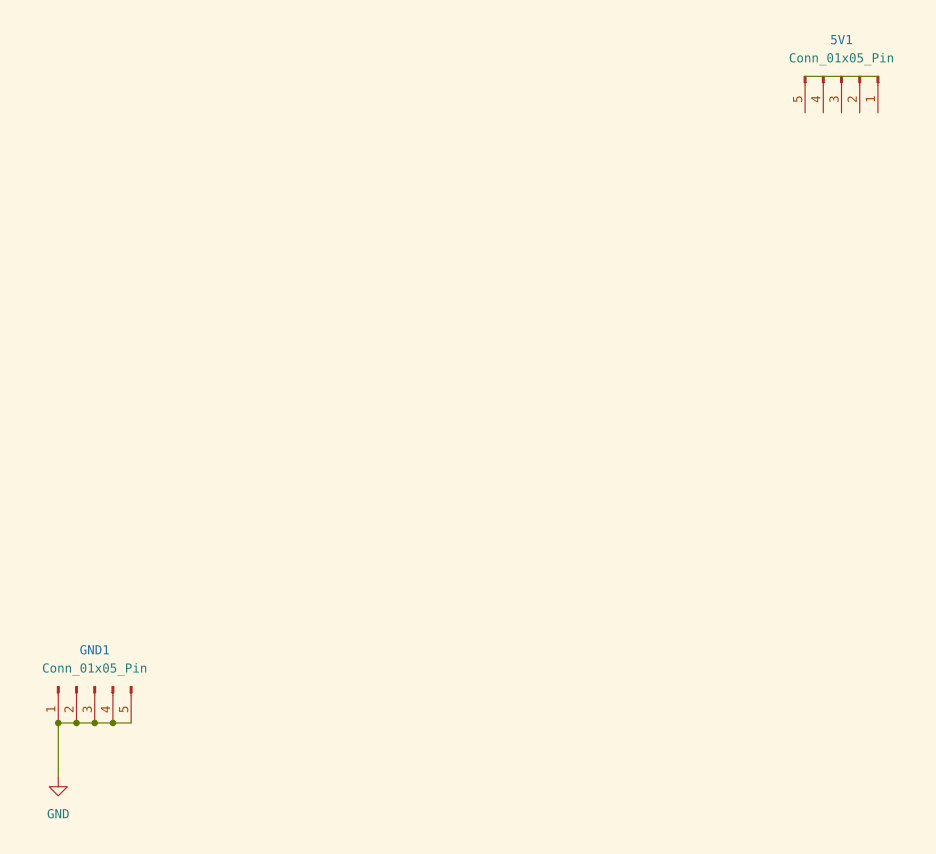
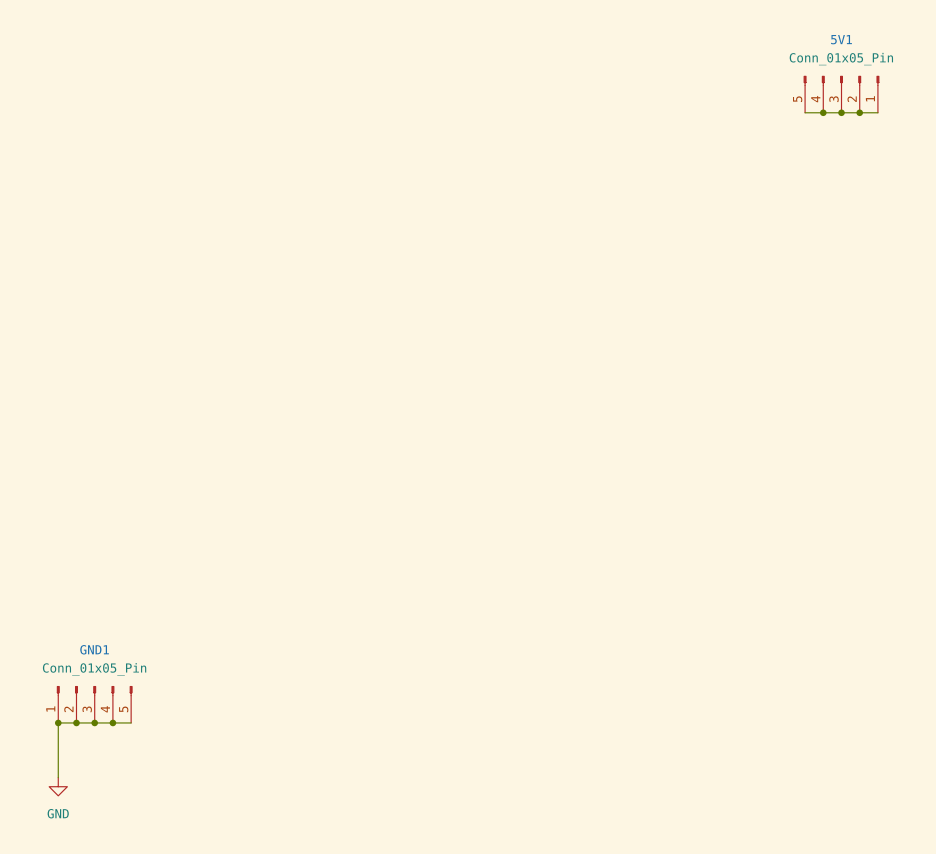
wire: (805, 76) (877, 76) -> (805, 112) (877, 112)
junction: none -> (823, 112)
junction: none -> (841, 112)
junction: none -> (859, 112)

